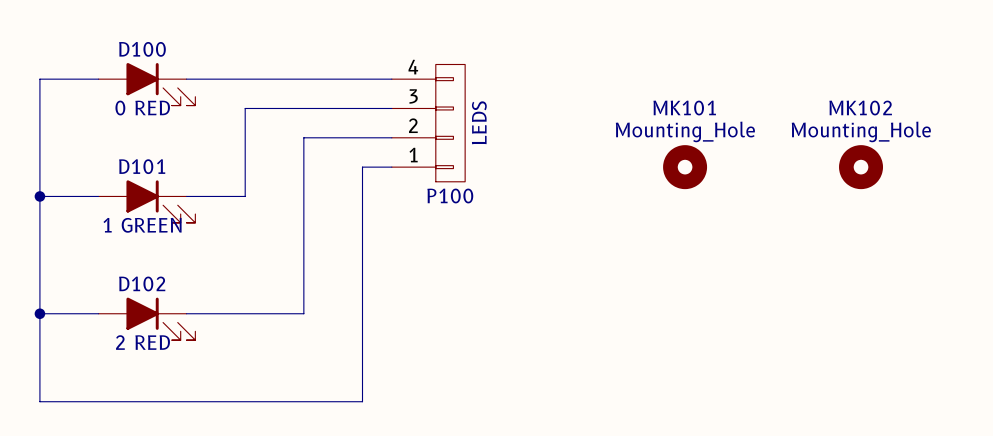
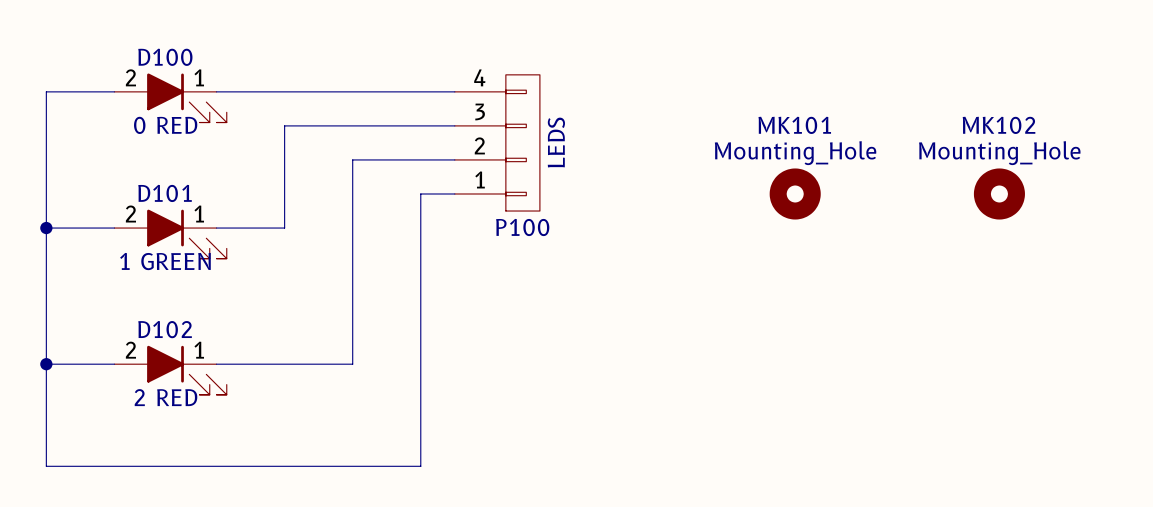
D100 symbol: [98, 63, 196, 106] -> [114, 73, 227, 123]
D101 symbol: [98, 180, 196, 223] -> [114, 209, 227, 259]
D102 symbol: [98, 297, 196, 341] -> [114, 345, 227, 395]

